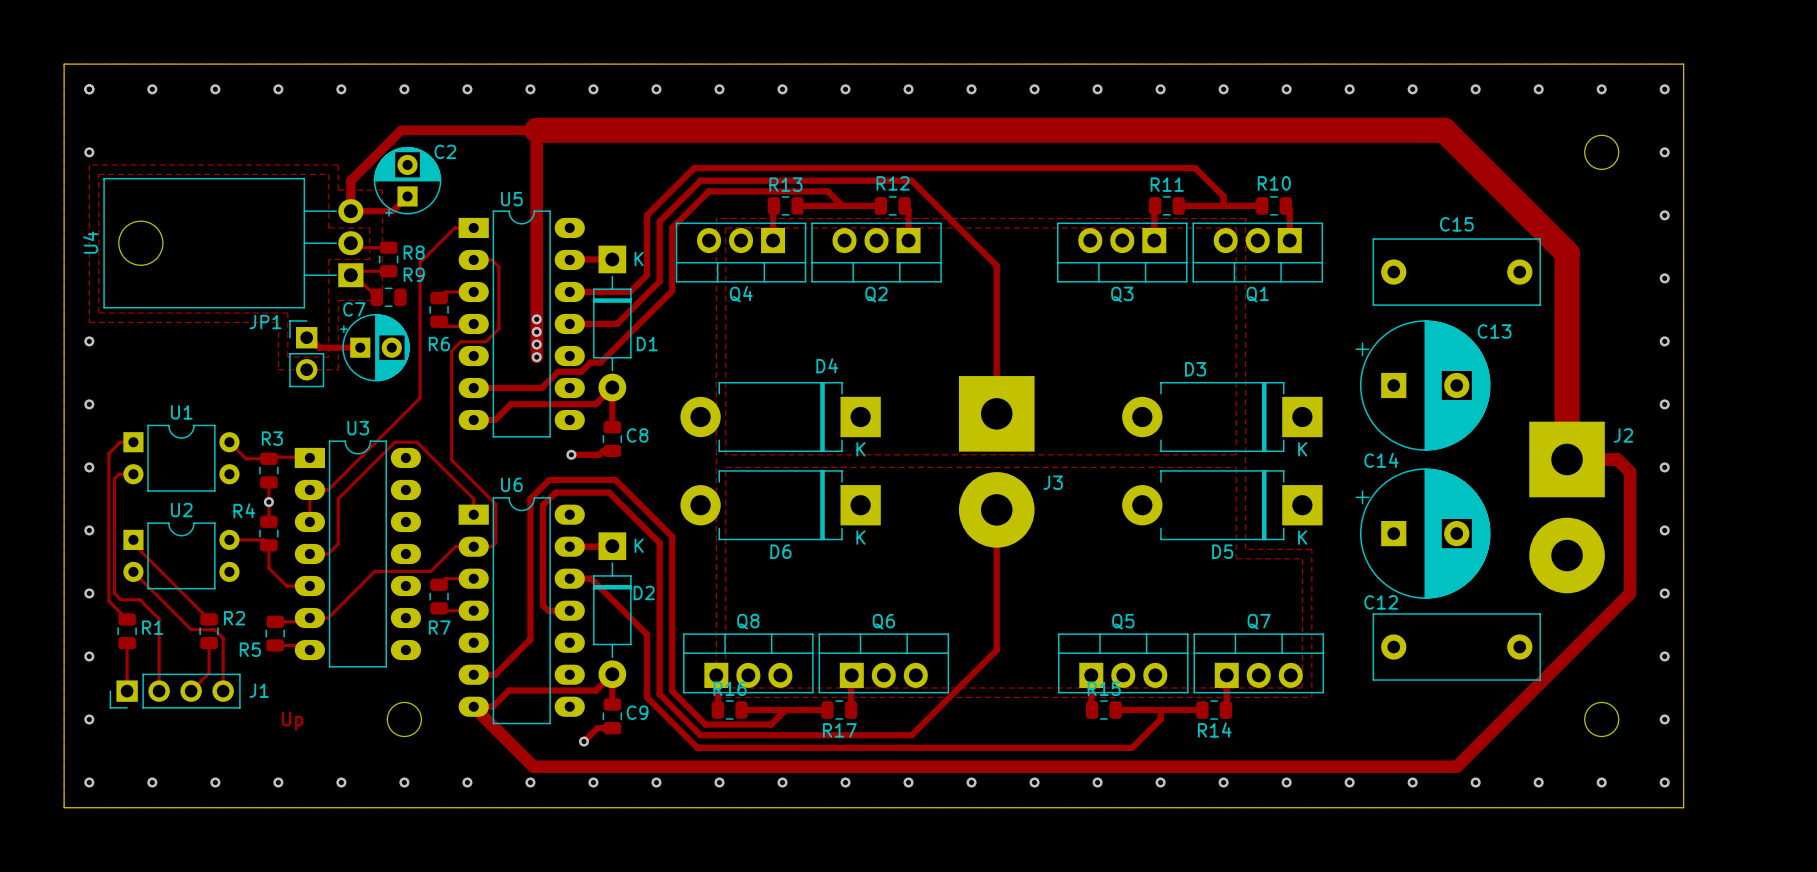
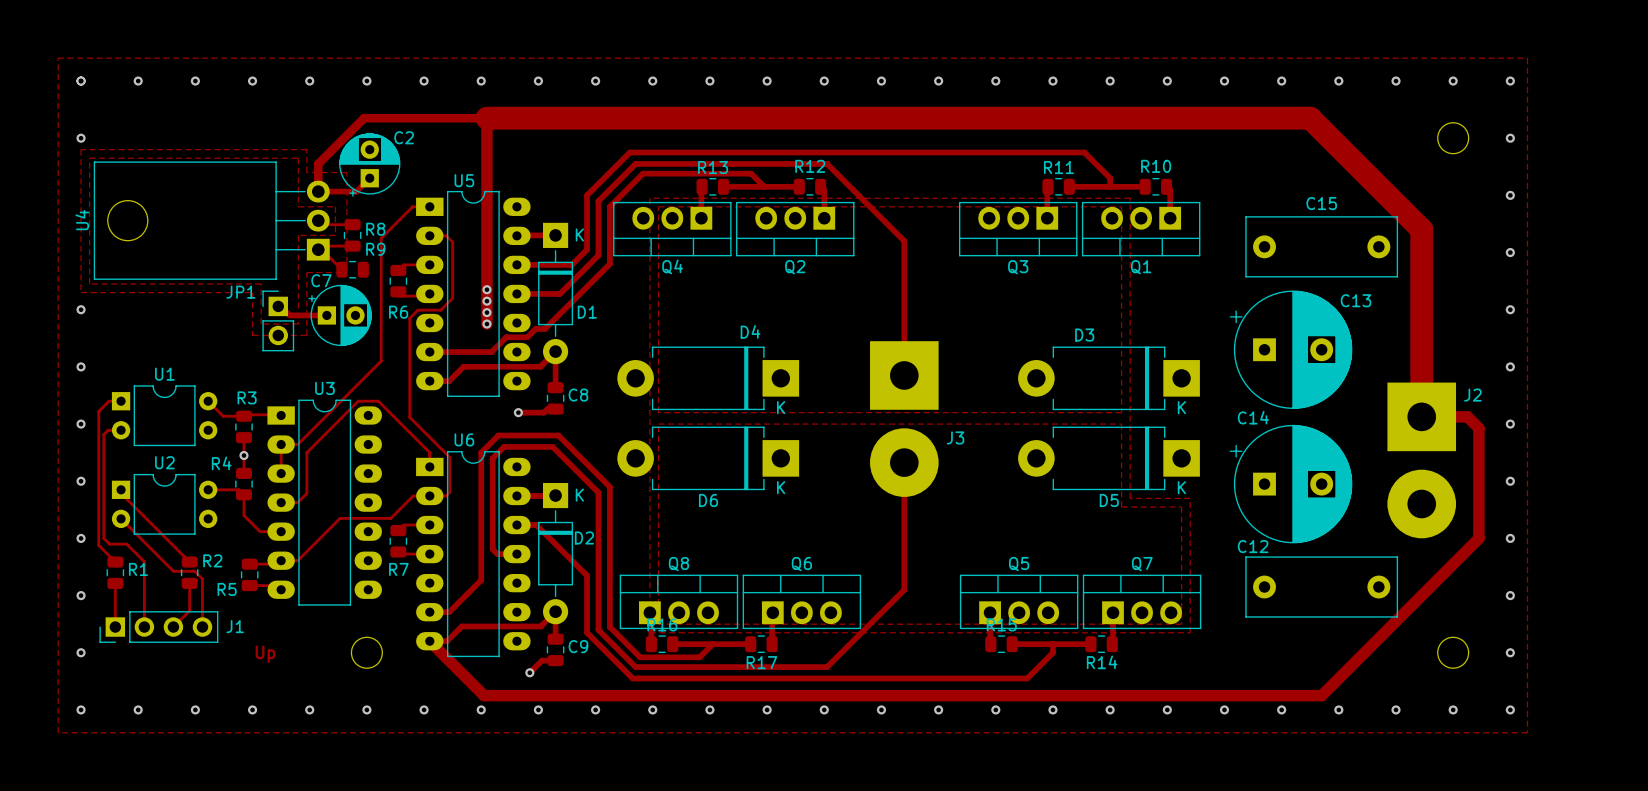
board edge: (64, 64) (1683, 64) (1683, 807) (64, 807) (64, 64) -> none

